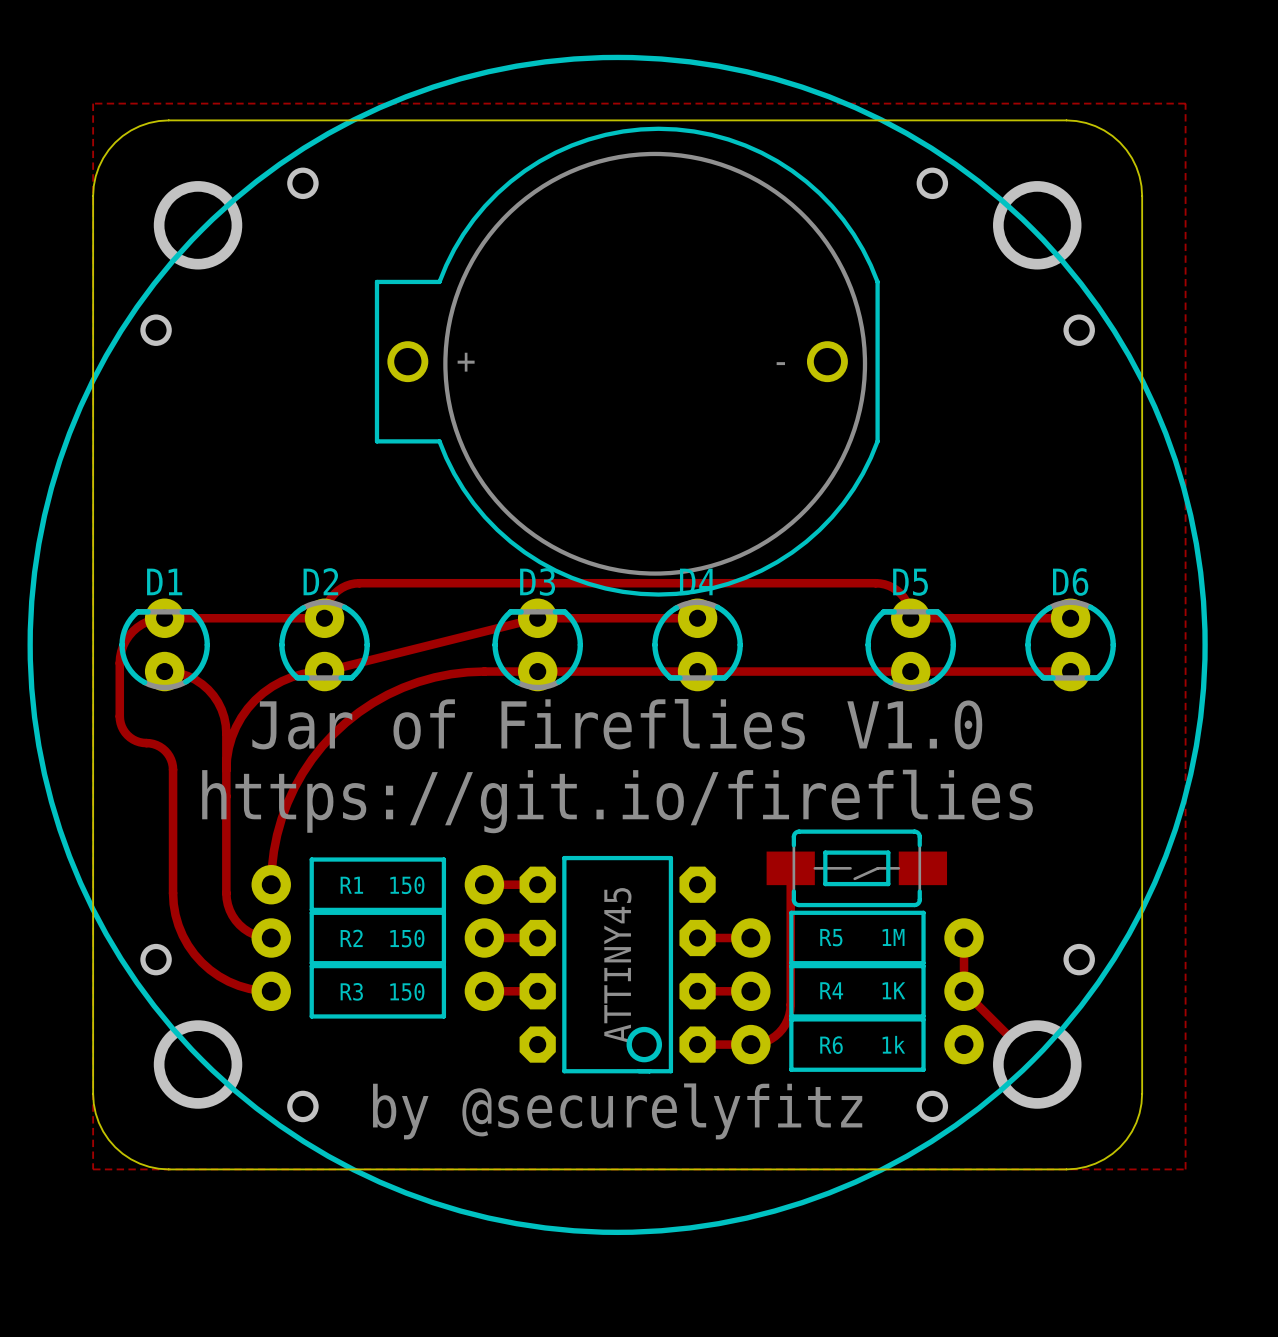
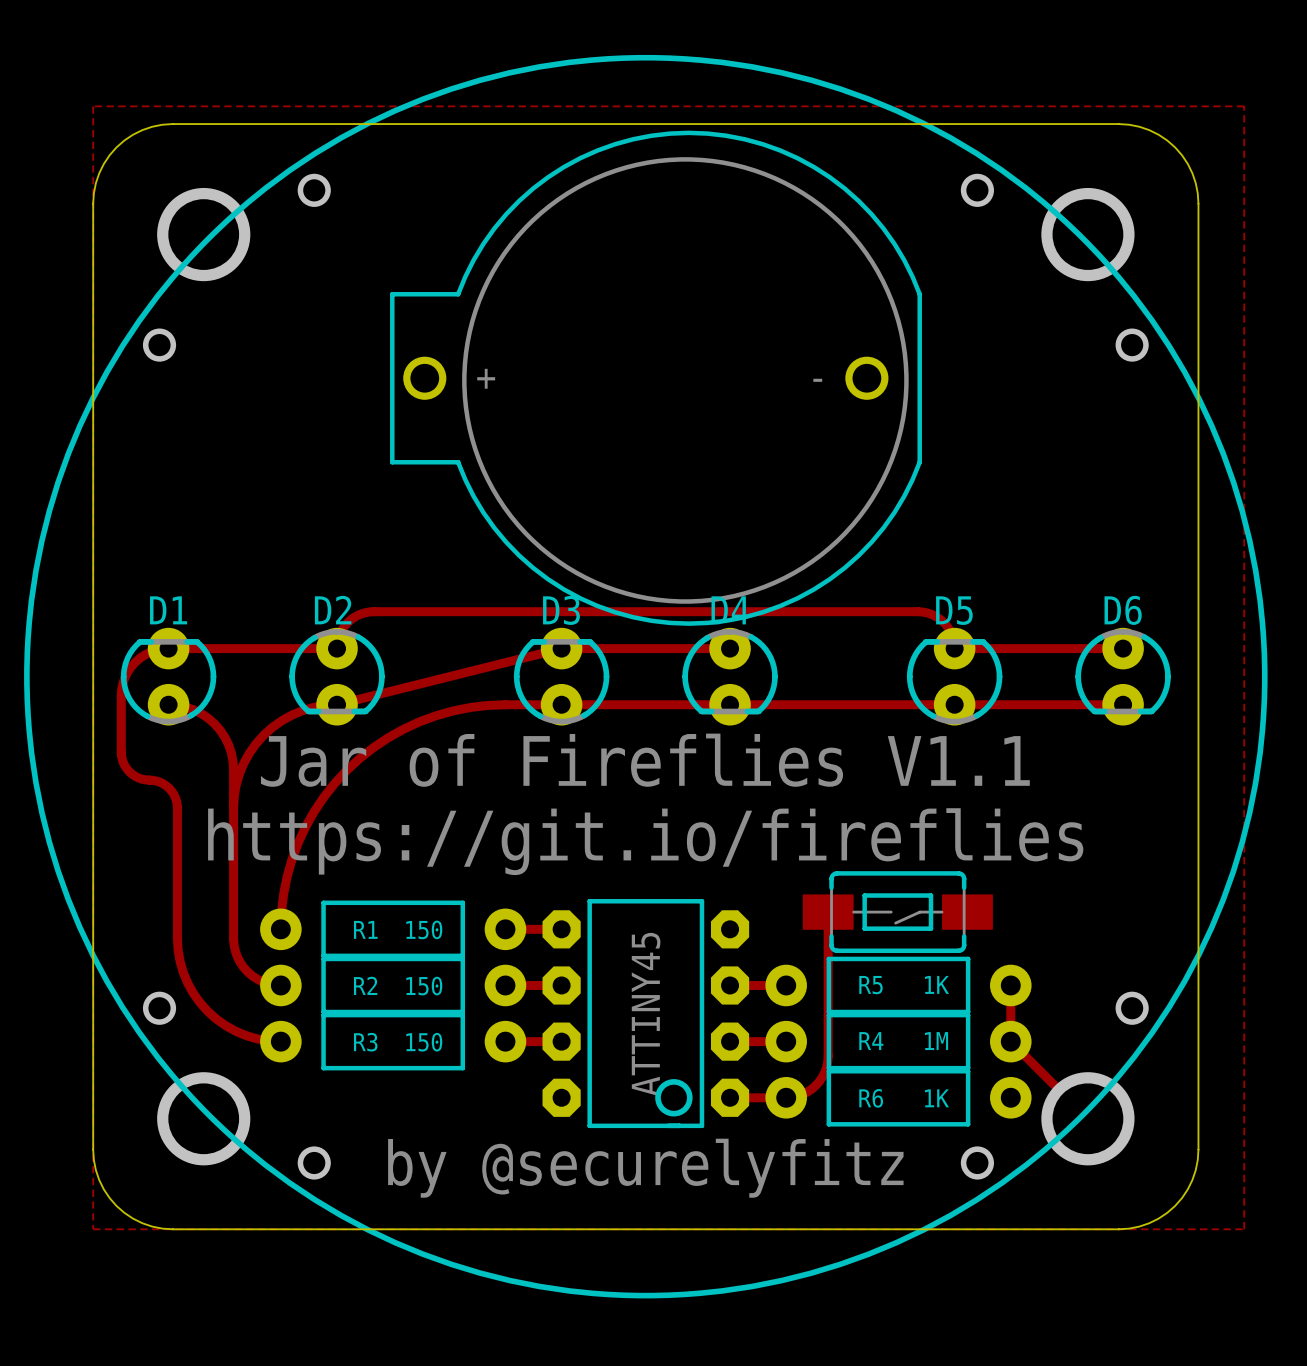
text: Jar of Fireflies V1.0 (617, 724) -> Jar of Fireflies V1.1 (645, 760)
R5 value: 1M (893, 937) -> 1K (936, 984)
R4 value: 1K (893, 990) -> 1M (936, 1041)
R6 value: 1k (893, 1044) -> 1K (936, 1098)

